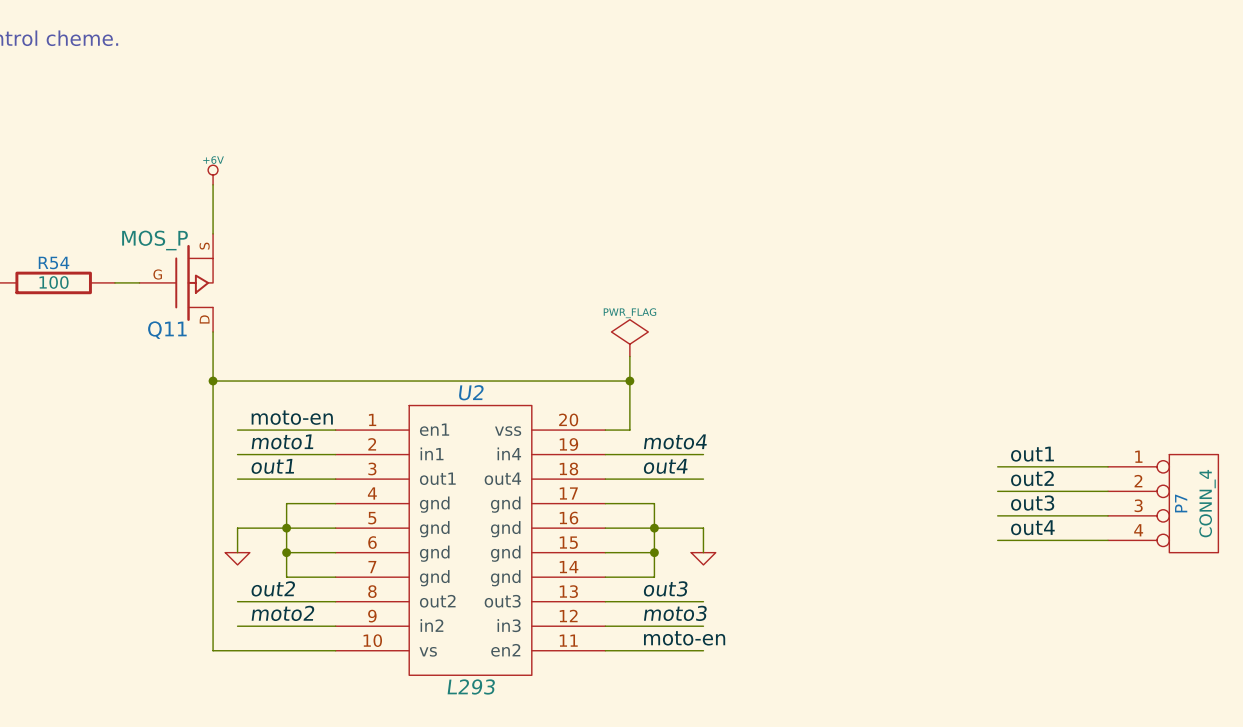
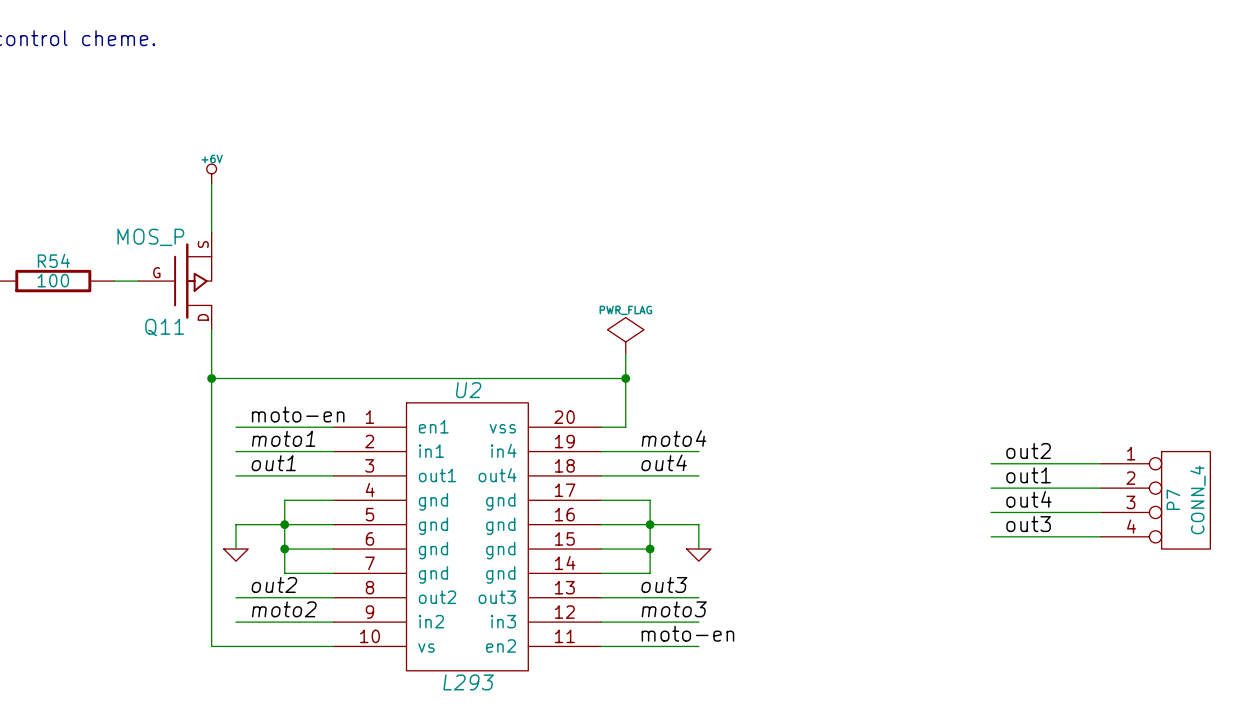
label: out1 (1032, 454) -> out2 (1028, 451)
label: out2 (1032, 478) -> out1 (1028, 475)
label: out3 (1032, 503) -> out4 (1028, 499)
label: out4 (1032, 527) -> out3 (1028, 524)

